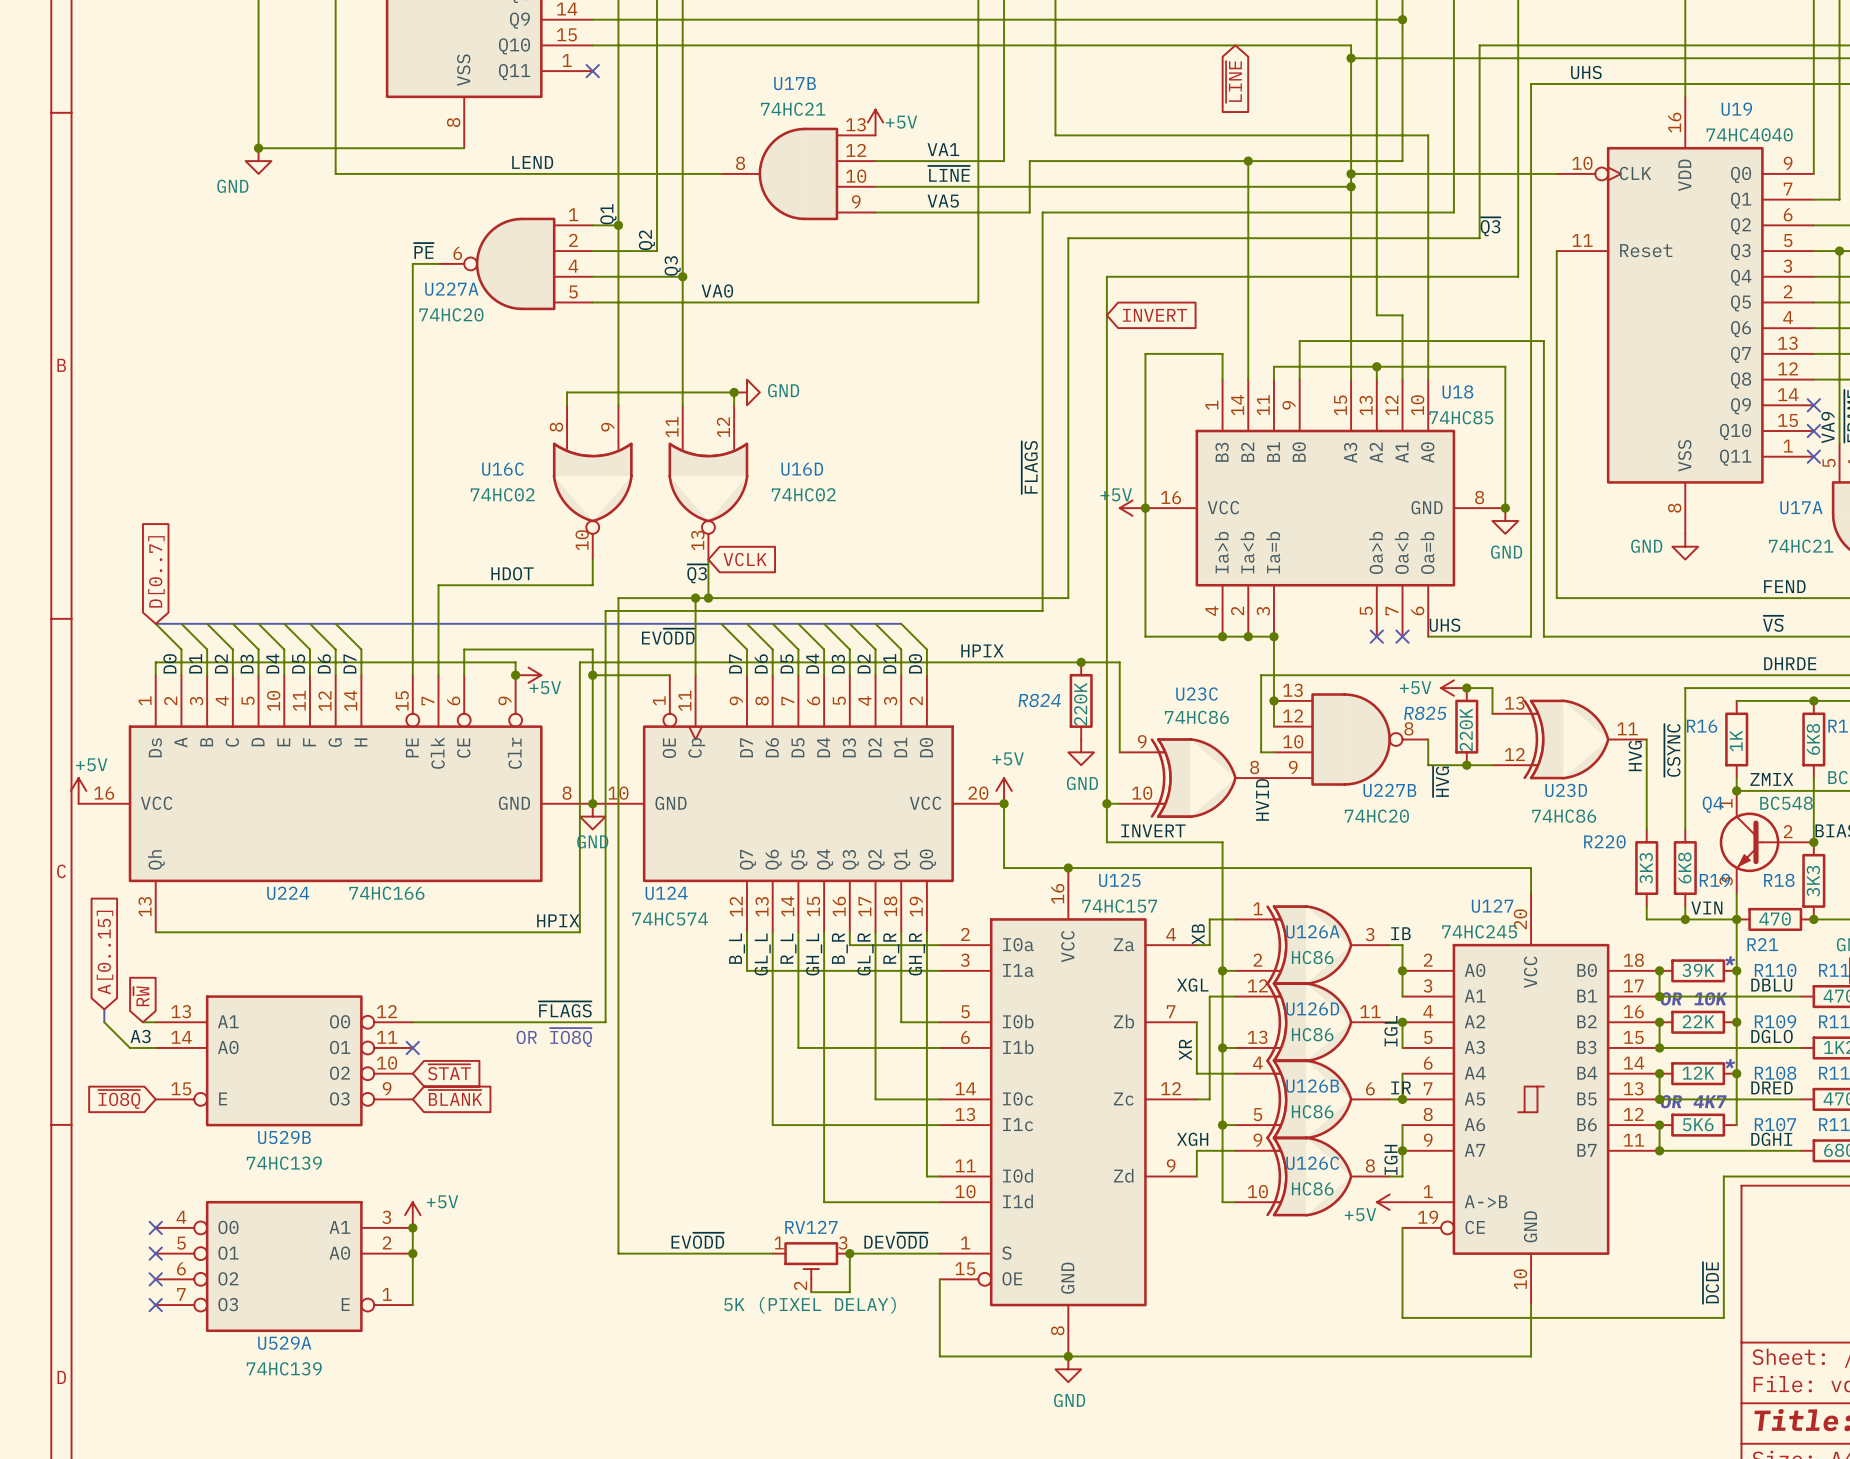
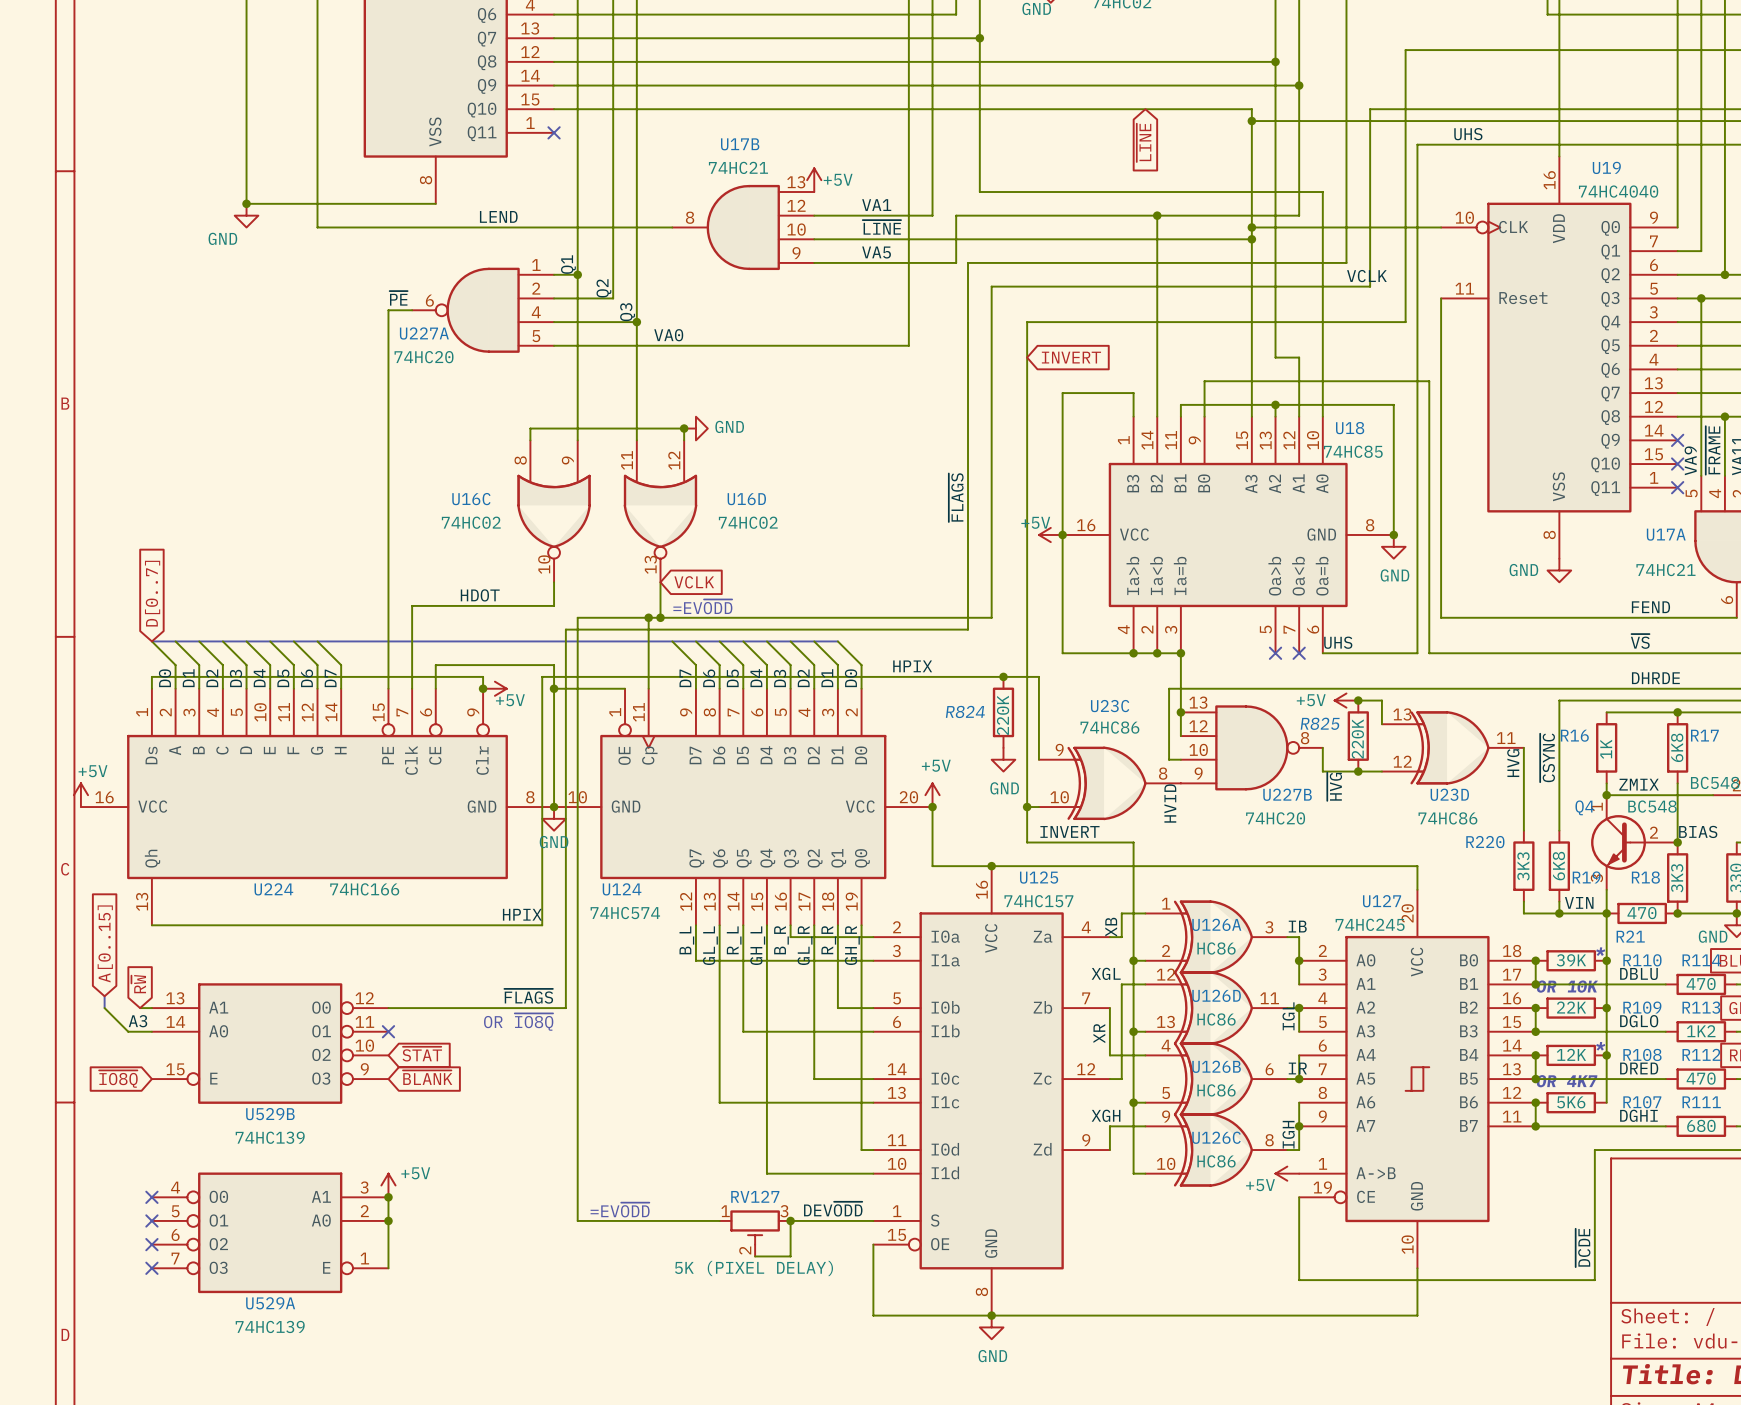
label: none -> VCLK (1366, 276)
label: ~{Q3} (1490, 226) -> none
label: ~{Q3} (697, 573) -> none
text: none -> =EV~{ODD} (702, 606)
label: EV~{ODD} (668, 636) -> none
label: EV~{ODD} (697, 1240) -> none
text: none -> =EV~{ODD} (620, 1210)

